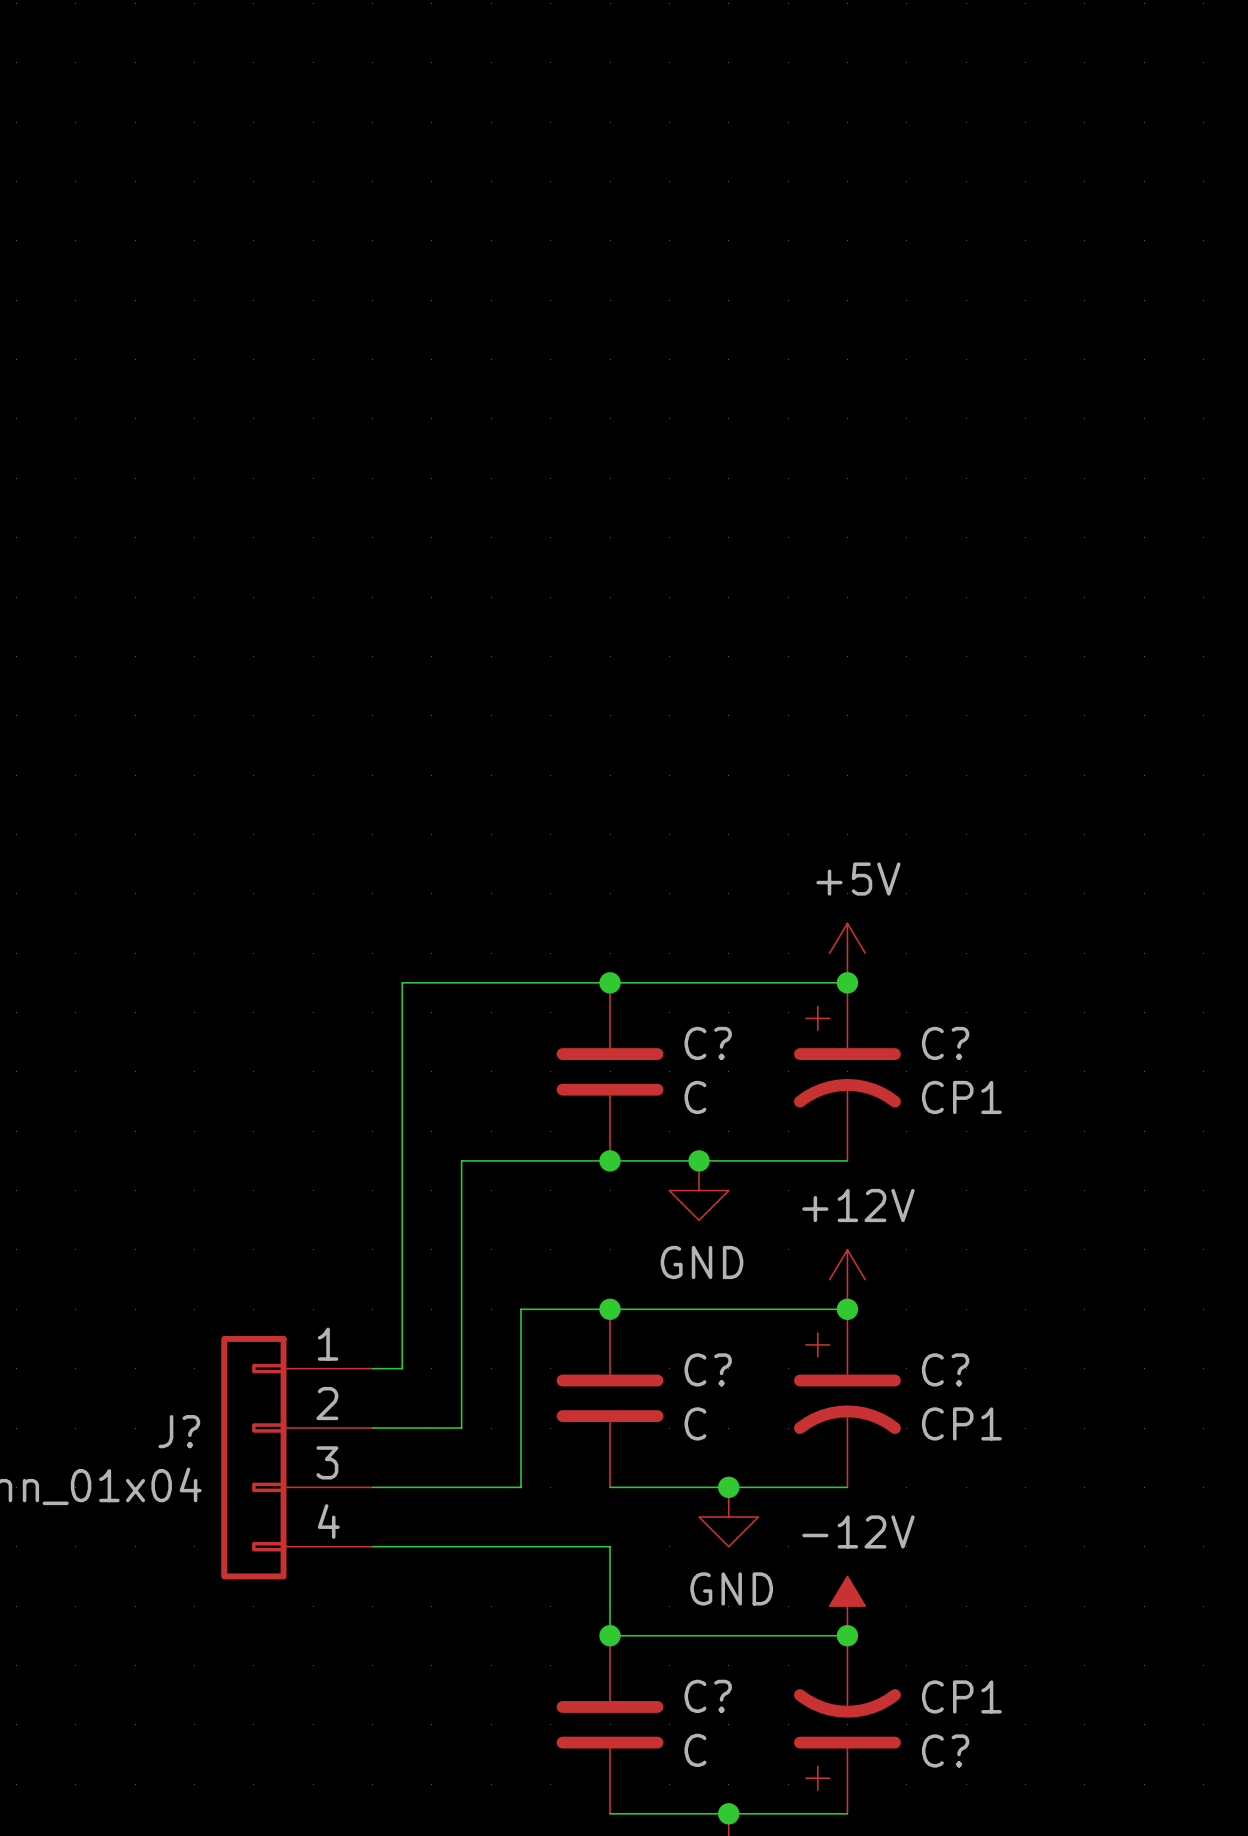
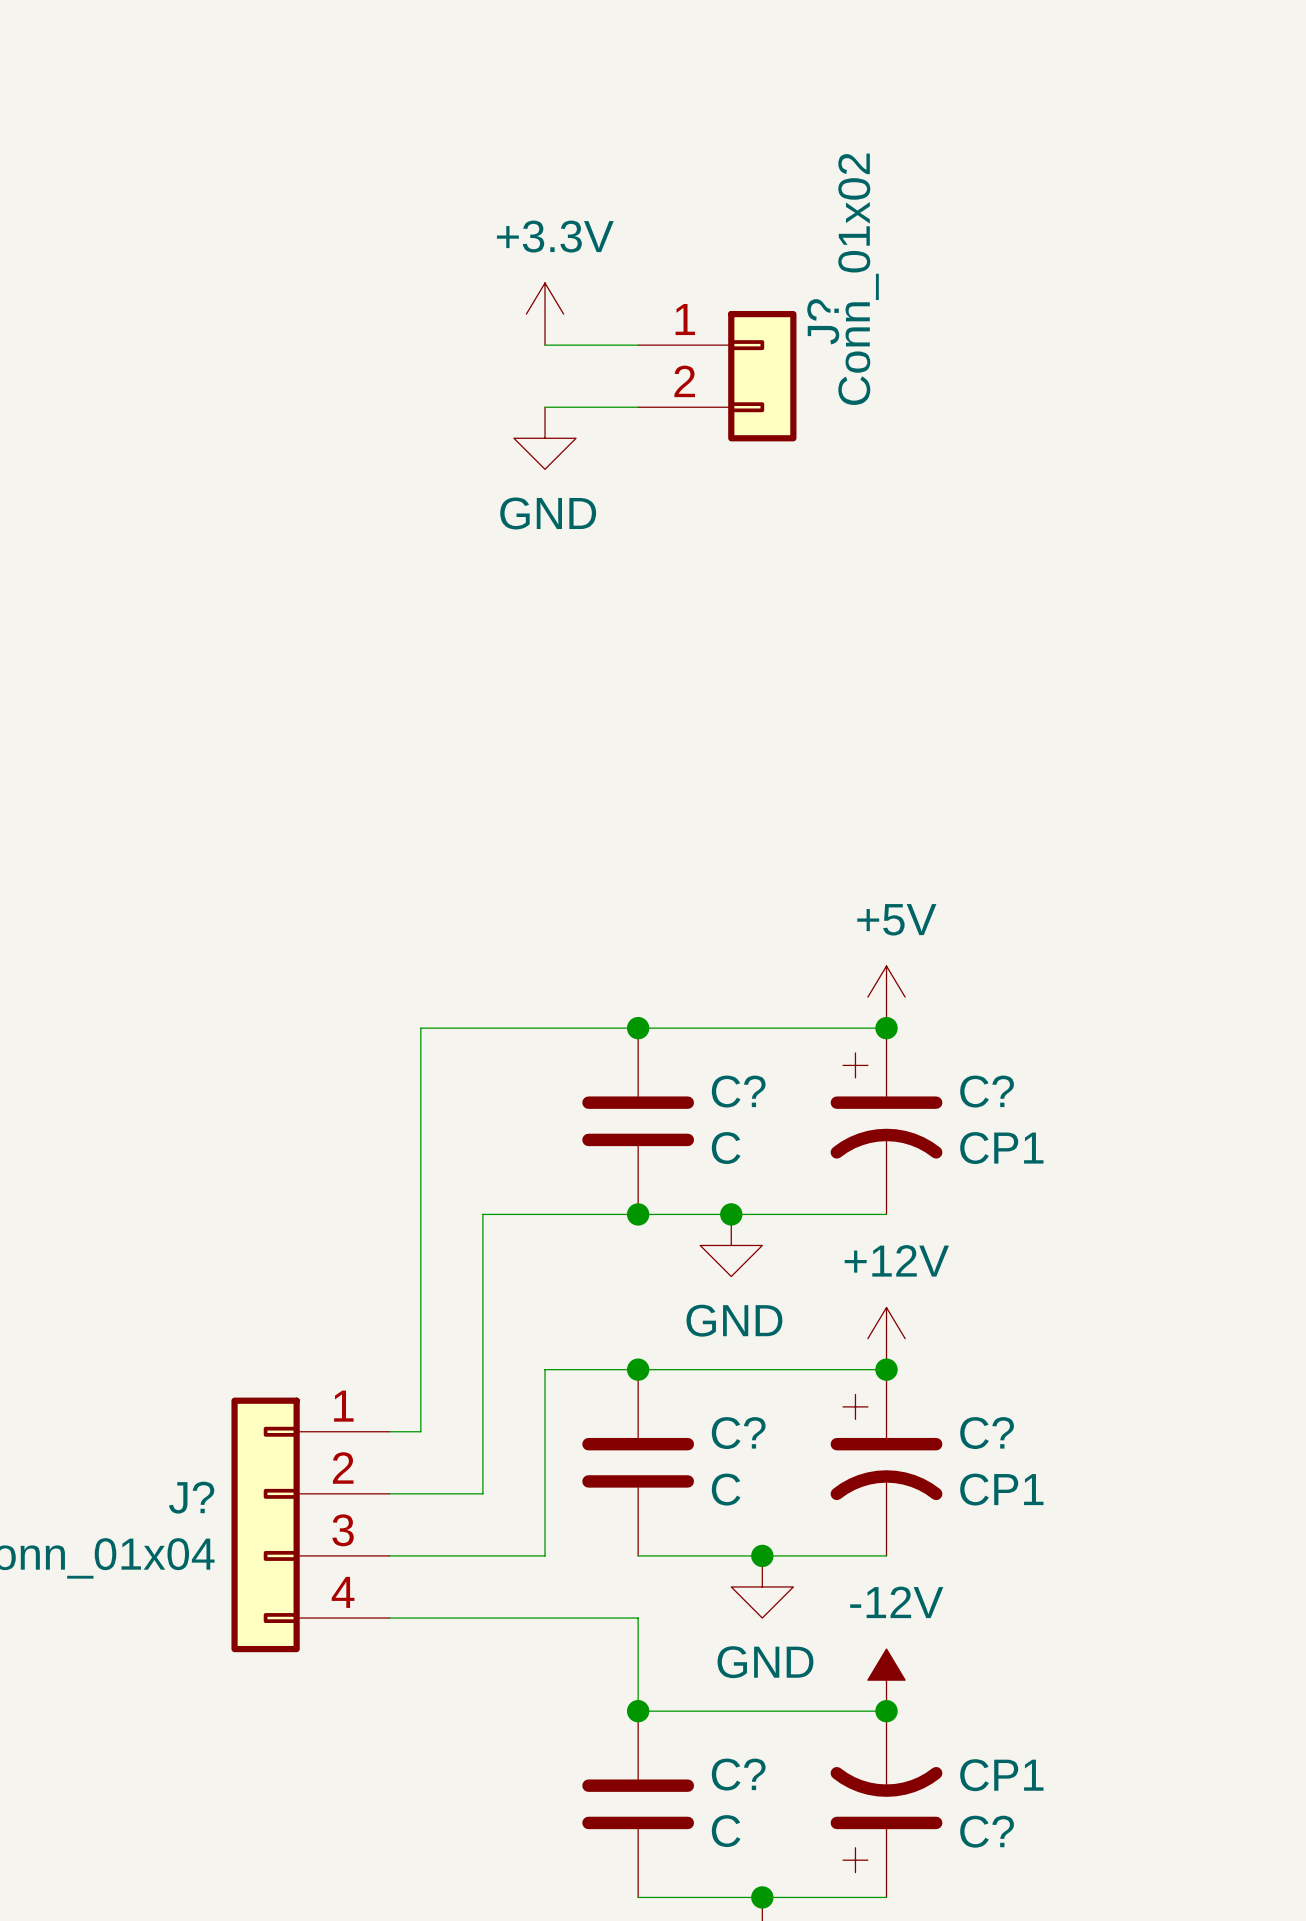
power symbol: none -> +3.3V (545, 314)
wire: none -> (545, 345) (638, 345)
J?: none -> Conn_01x02 (717, 376)
wire: none -> (545, 407) (638, 407)
power symbol: none -> GND (545, 438)

